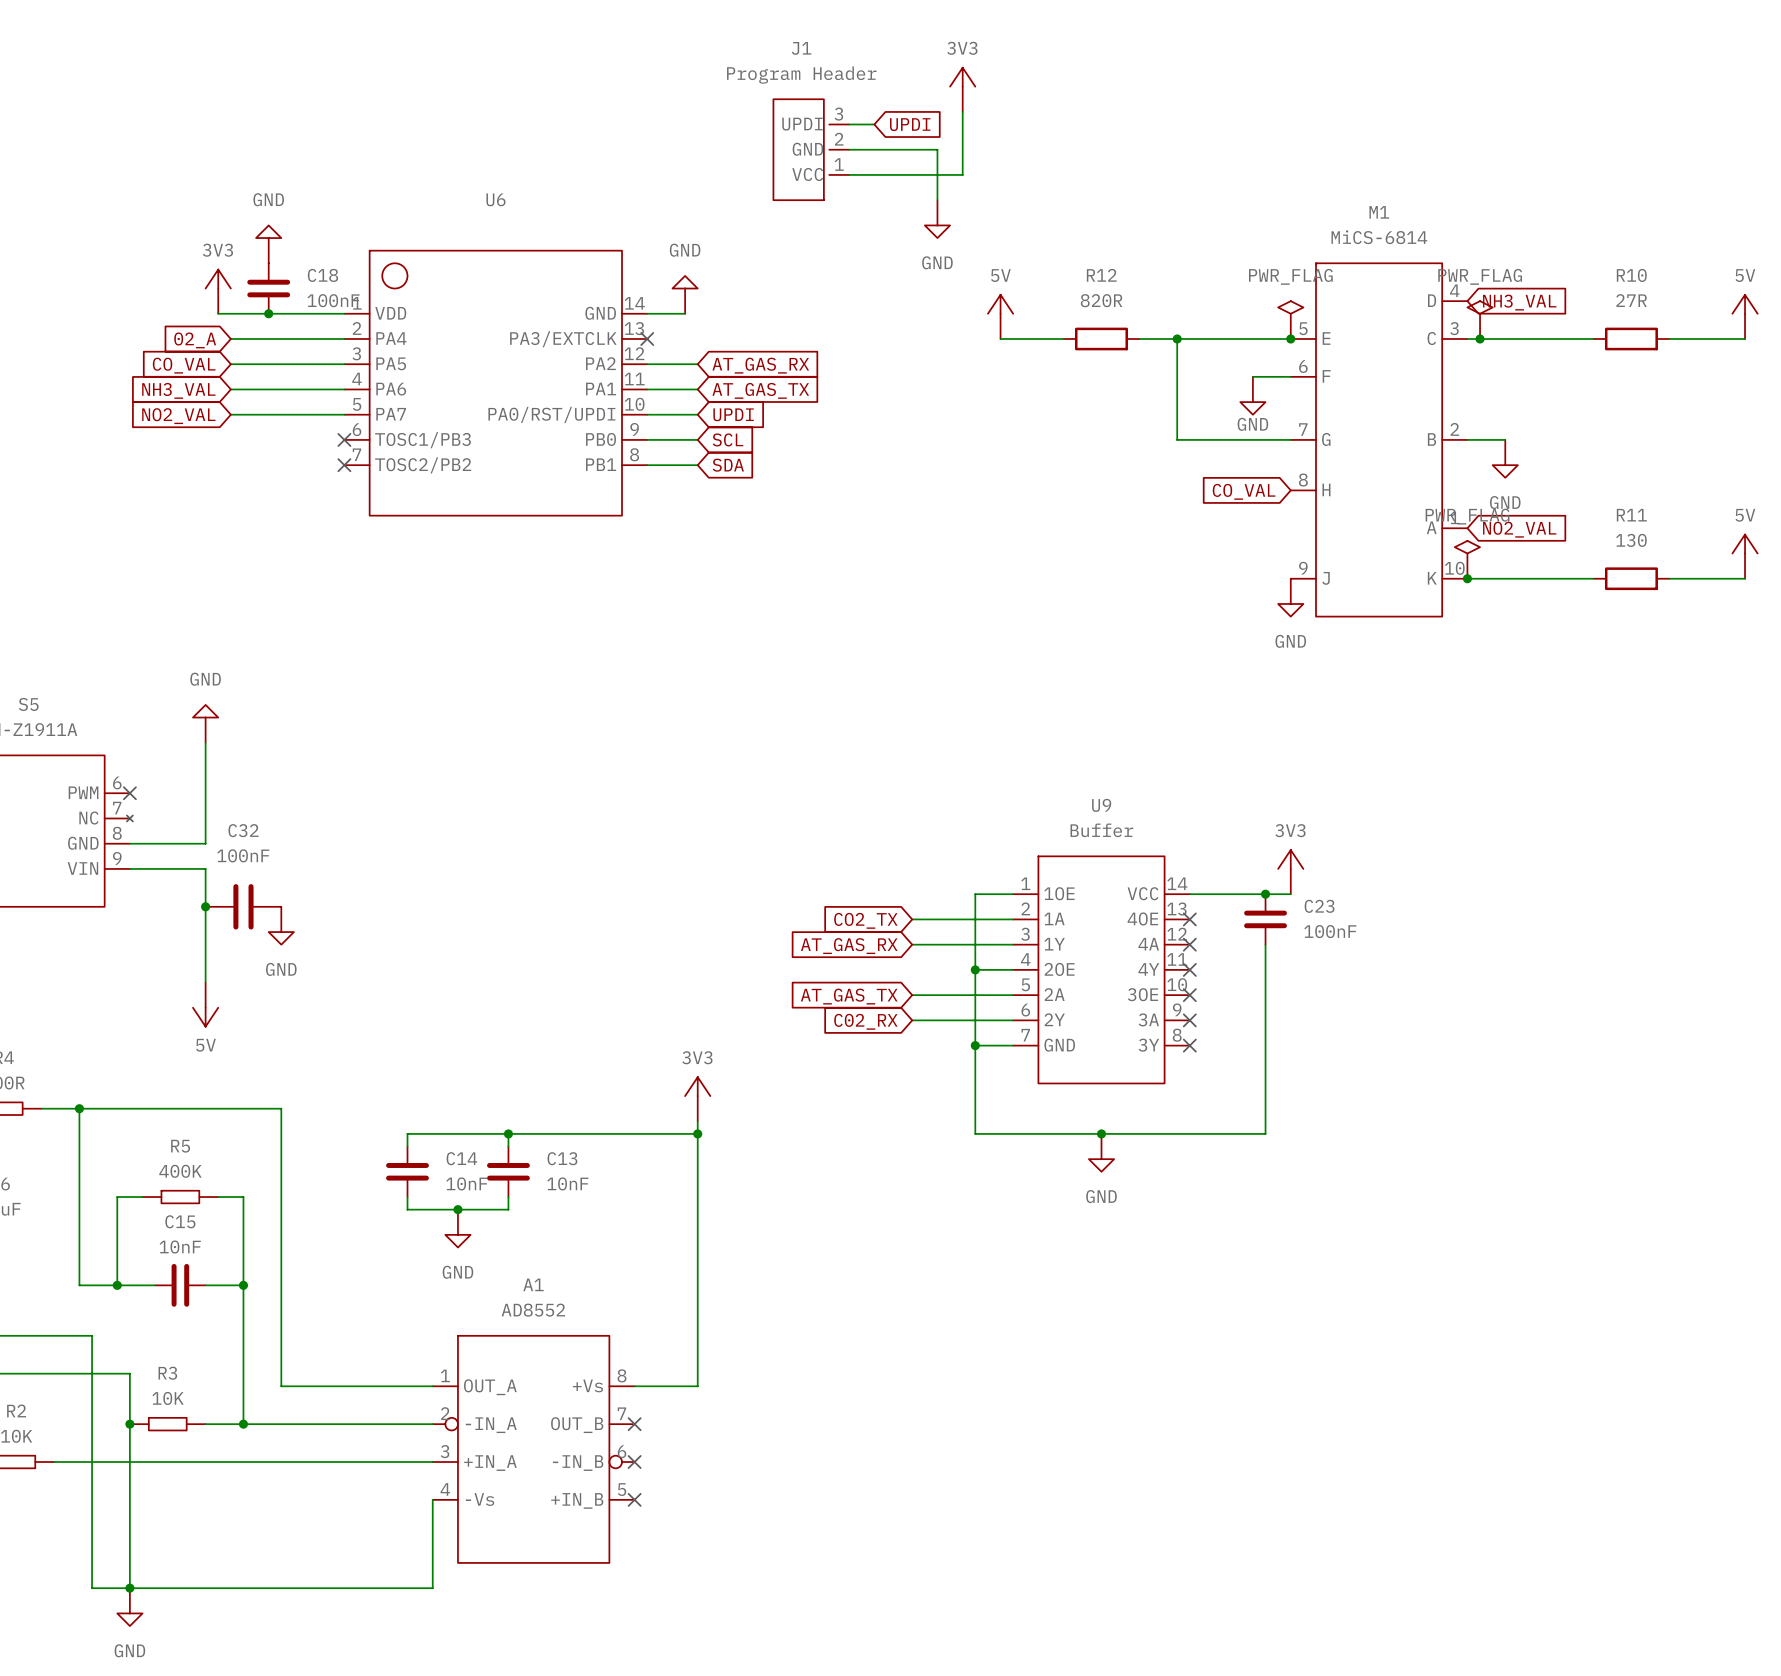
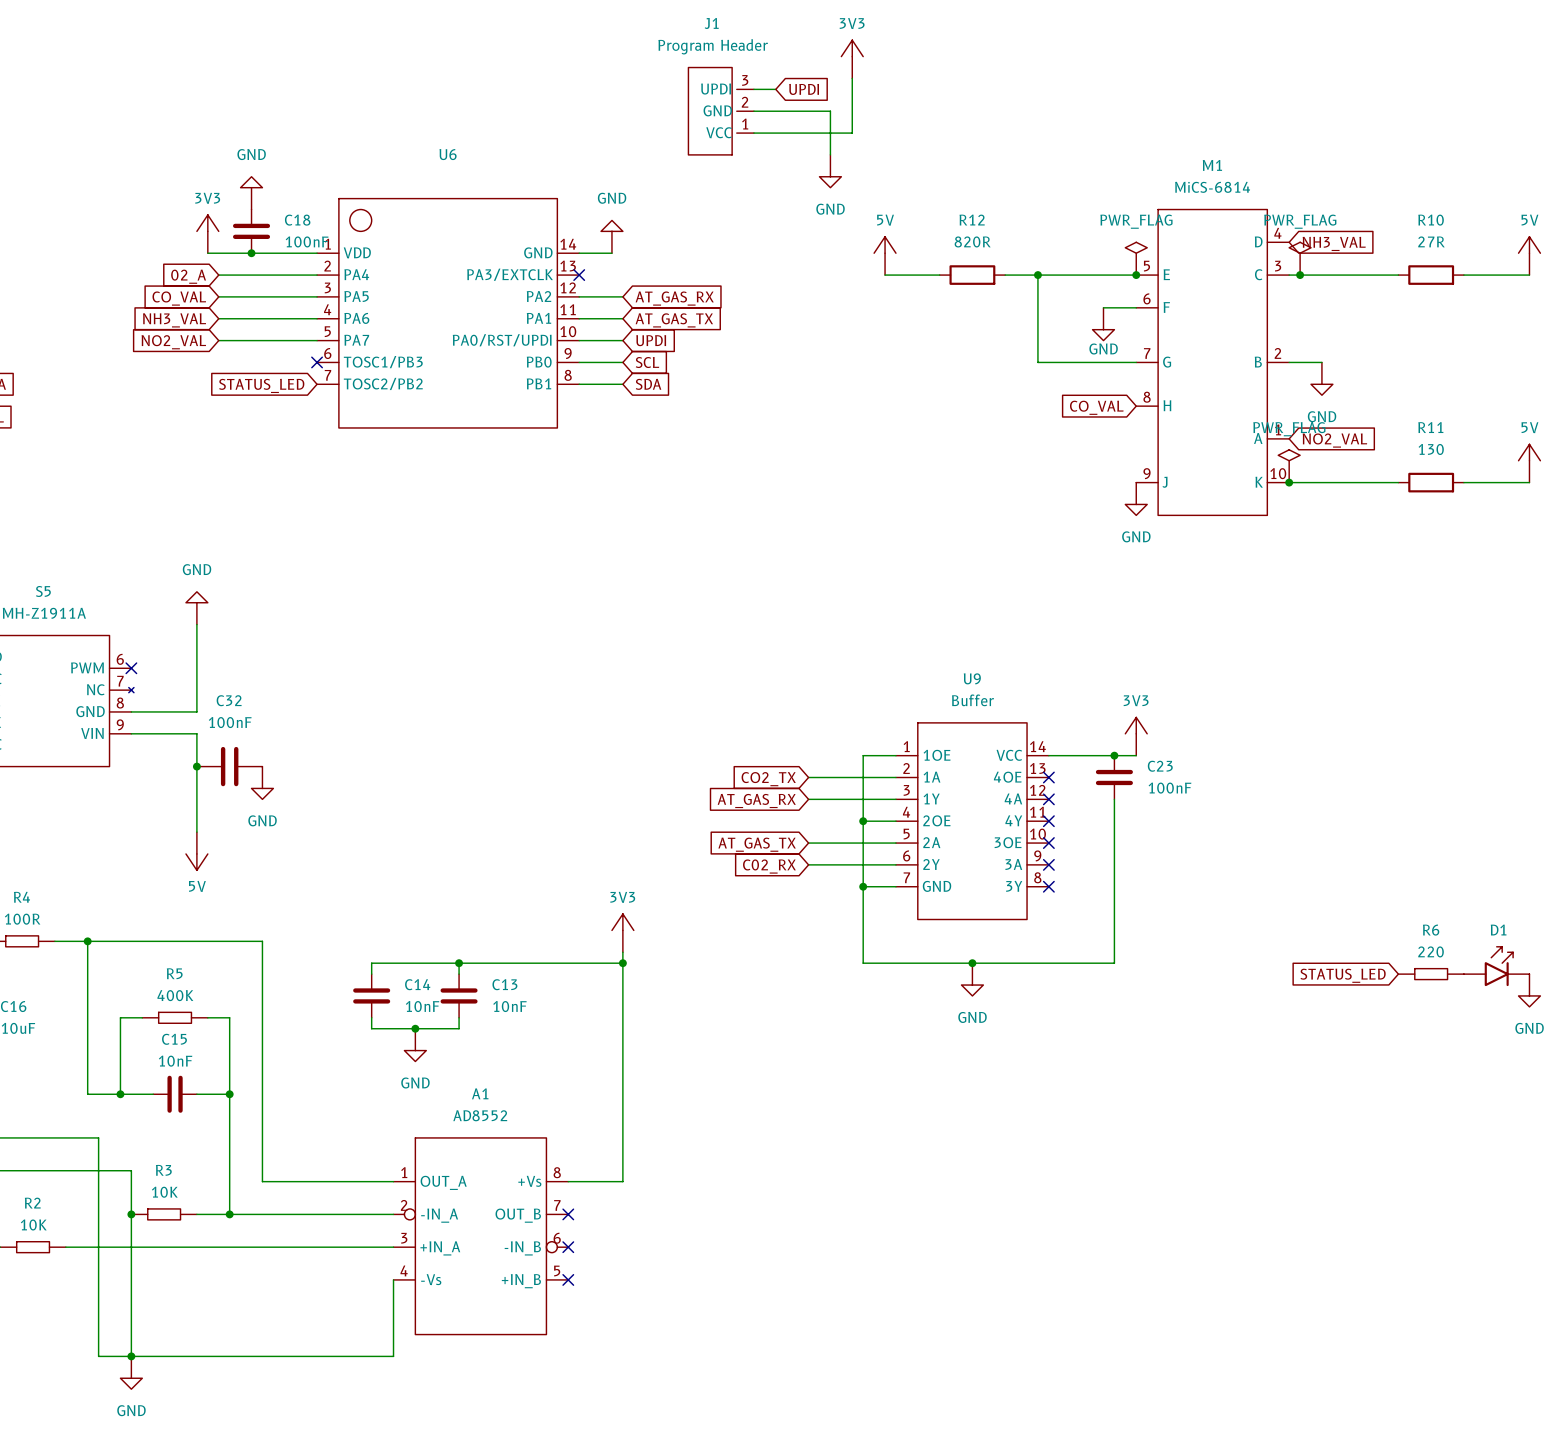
no-connect mark: (344, 465) -> none
global label: none -> STATUS_LED (261, 385)
D1: none -> (1496, 966)
R6: none -> 220 (1431, 974)
global label: none -> STATUS_LED (1343, 975)
power symbol: none -> GND (1529, 990)

